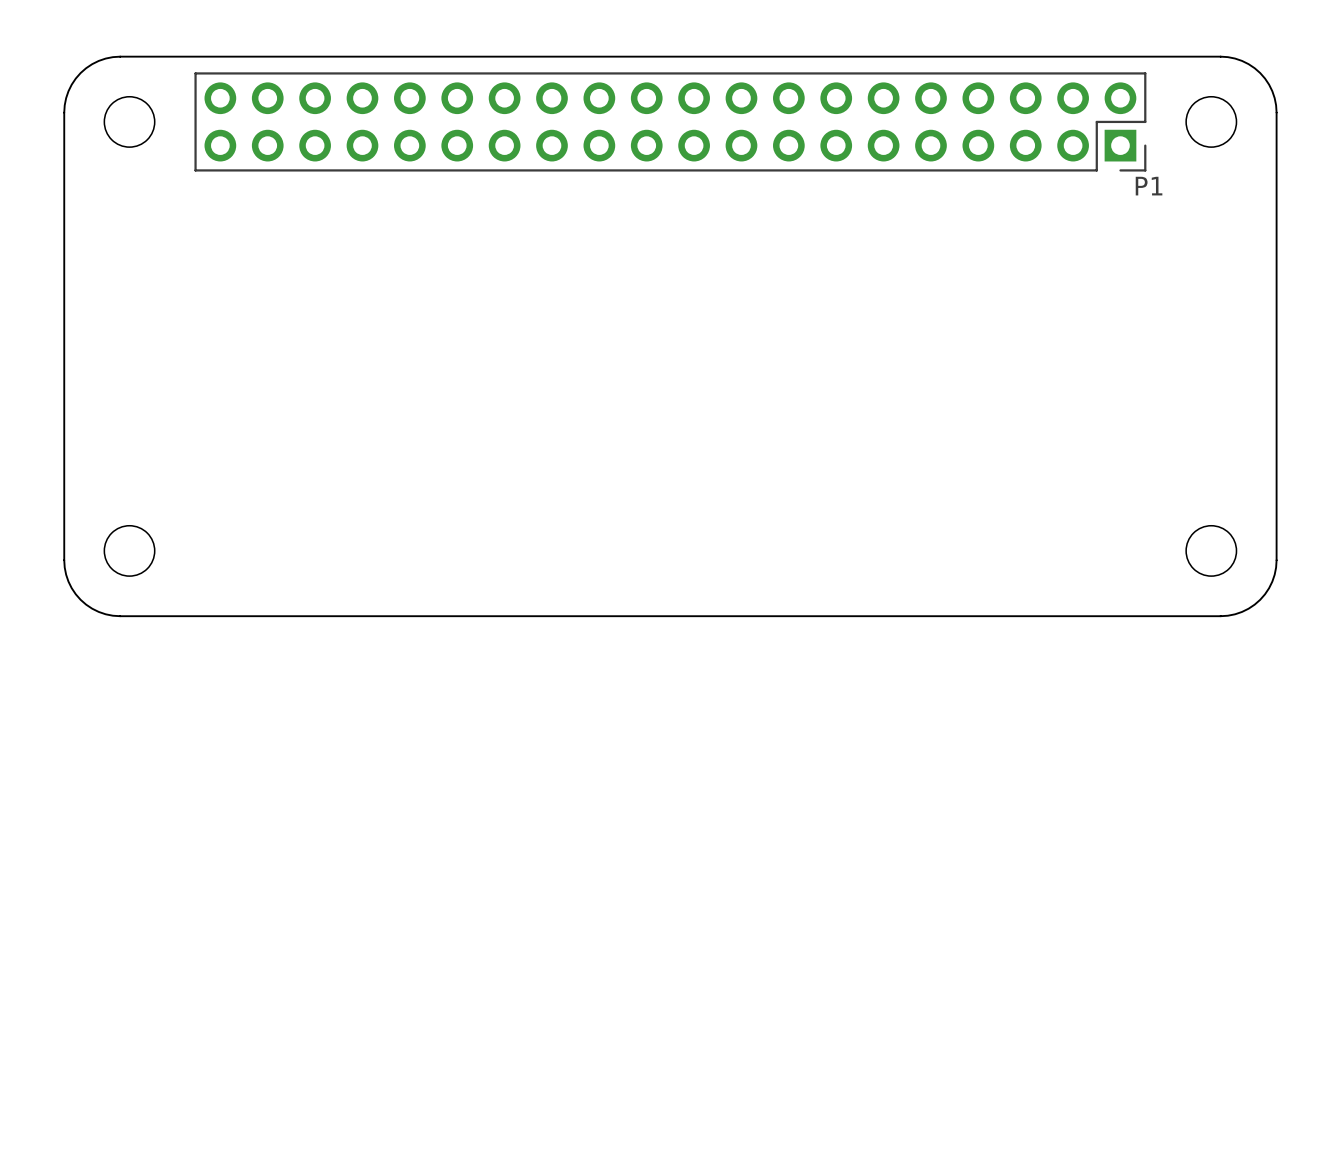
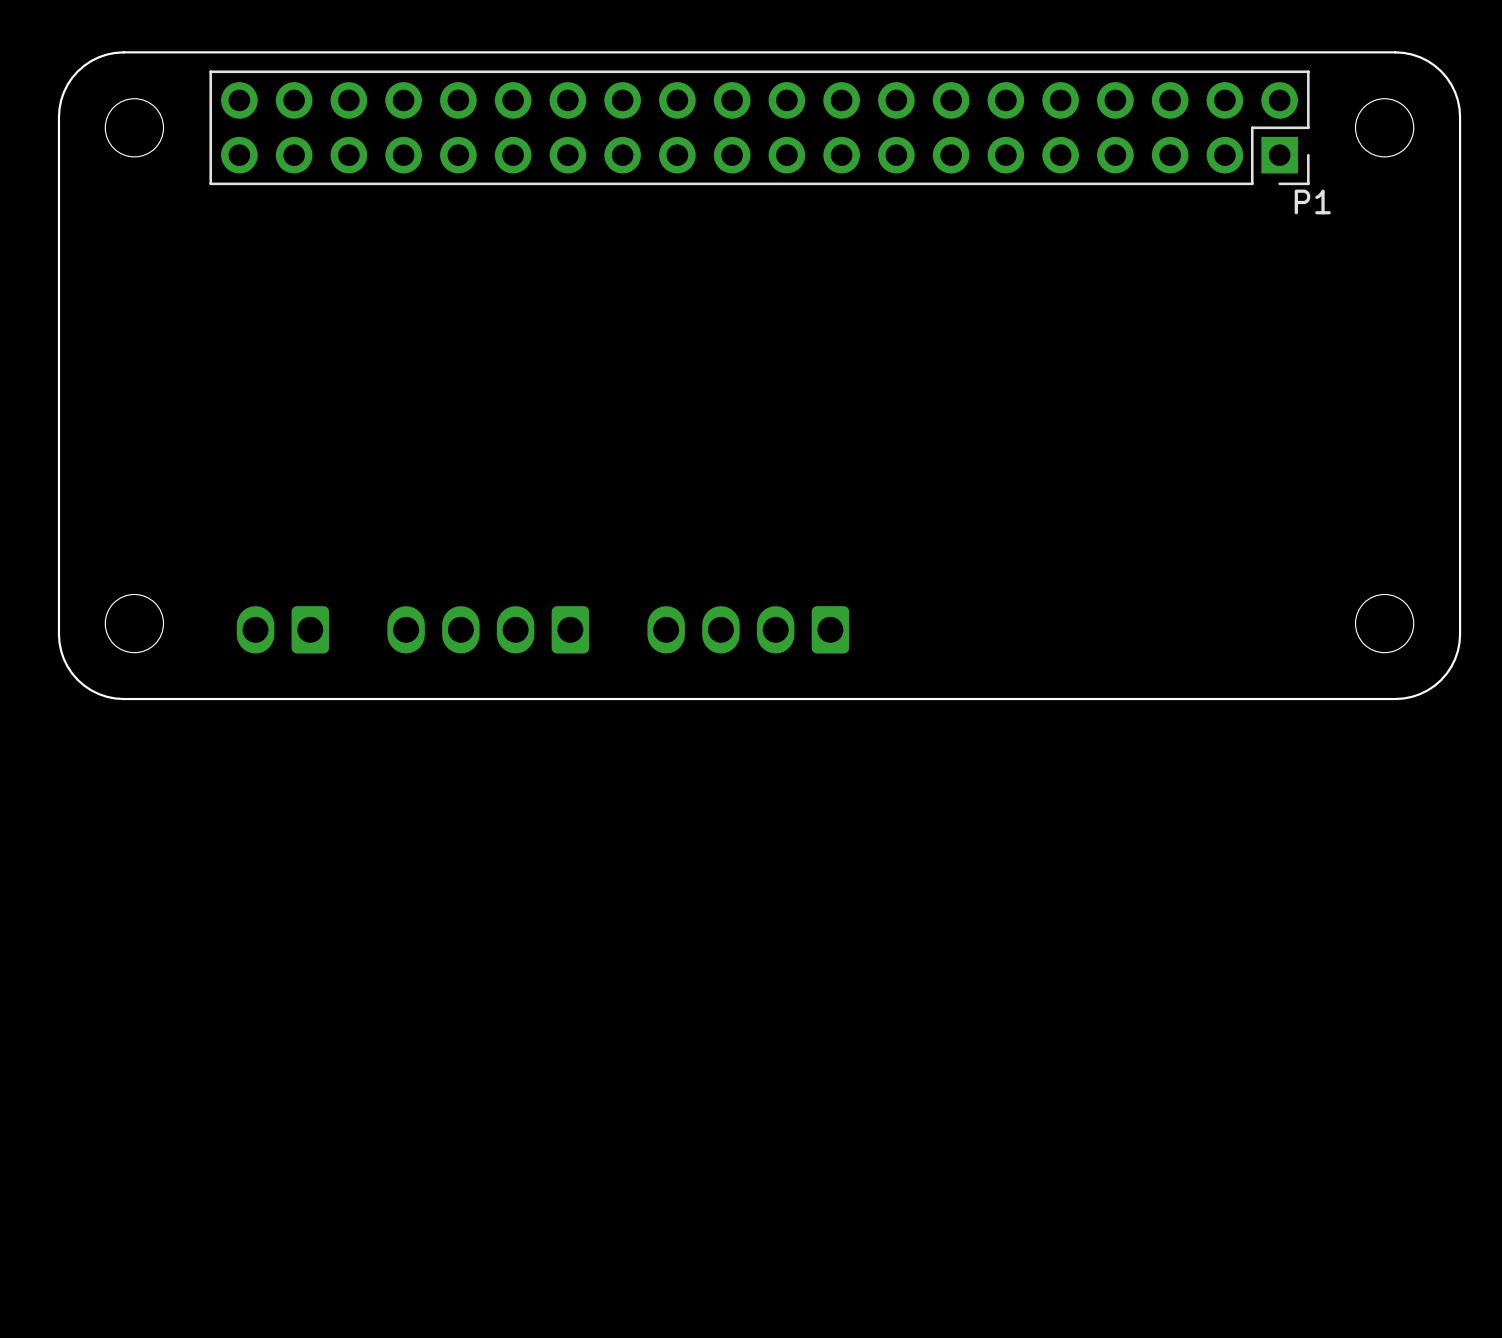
part: none -> (282, 629)
part: none -> (488, 629)
part: none -> (748, 629)

